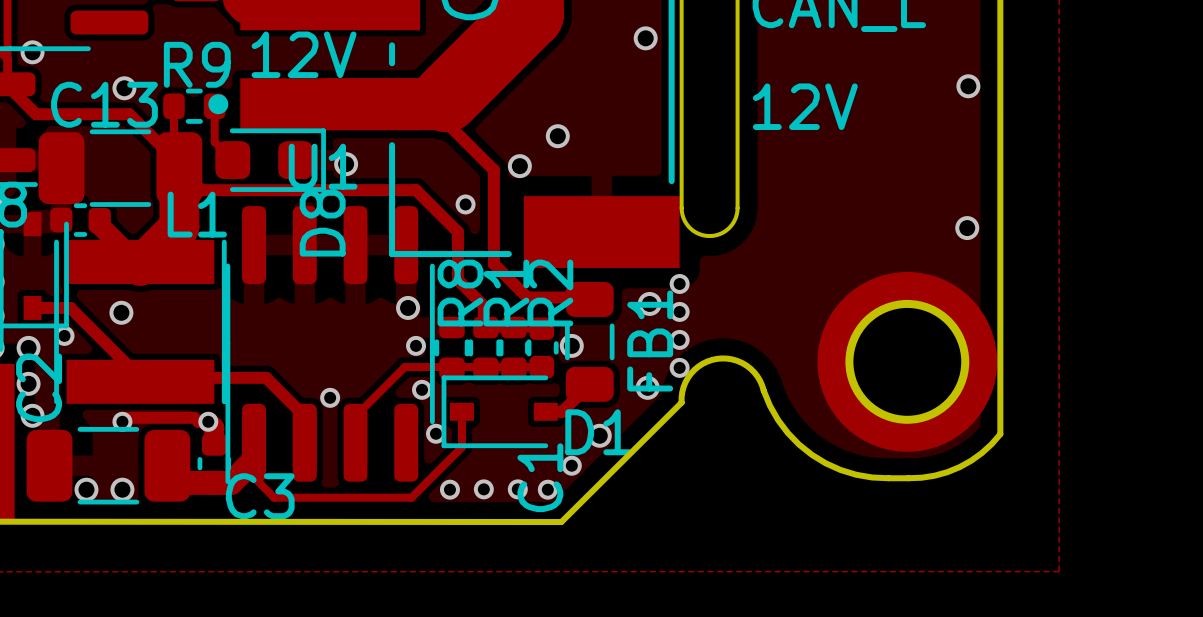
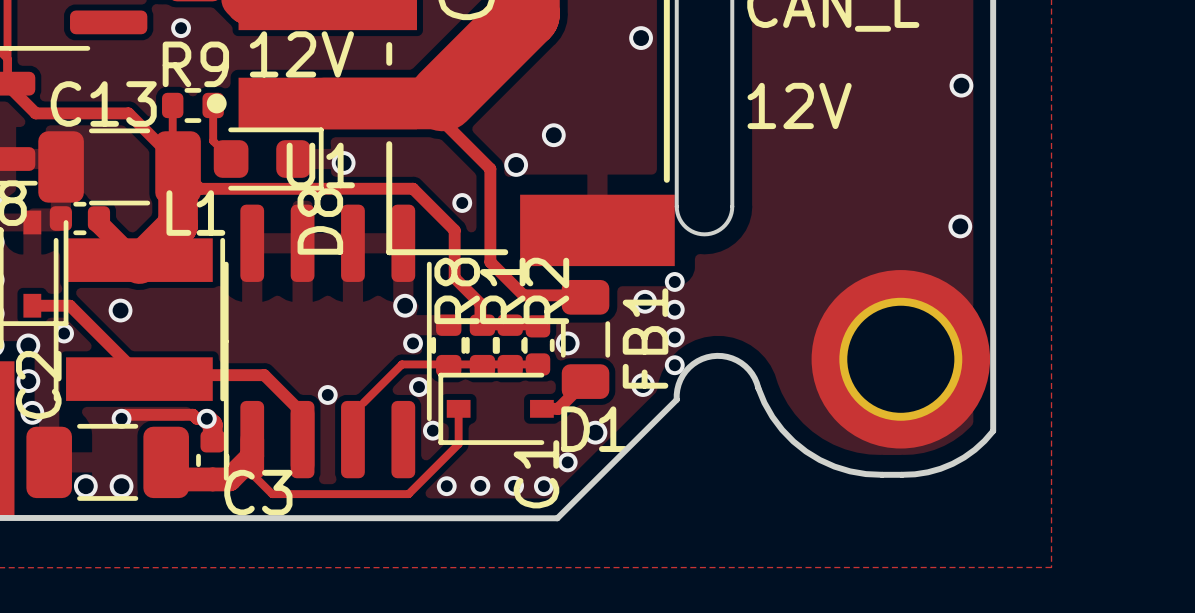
via: none -> (181, 28)
via: (32, 52) -> none
via: (124, 88) -> none

